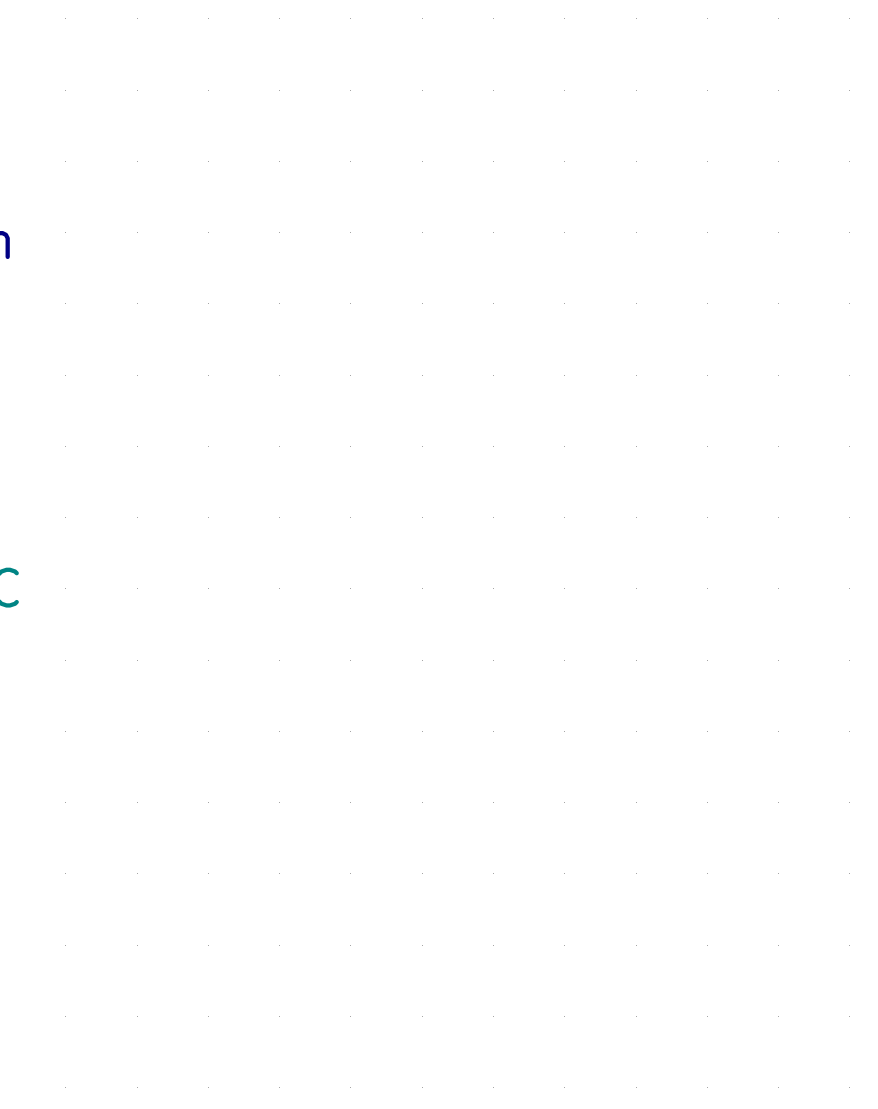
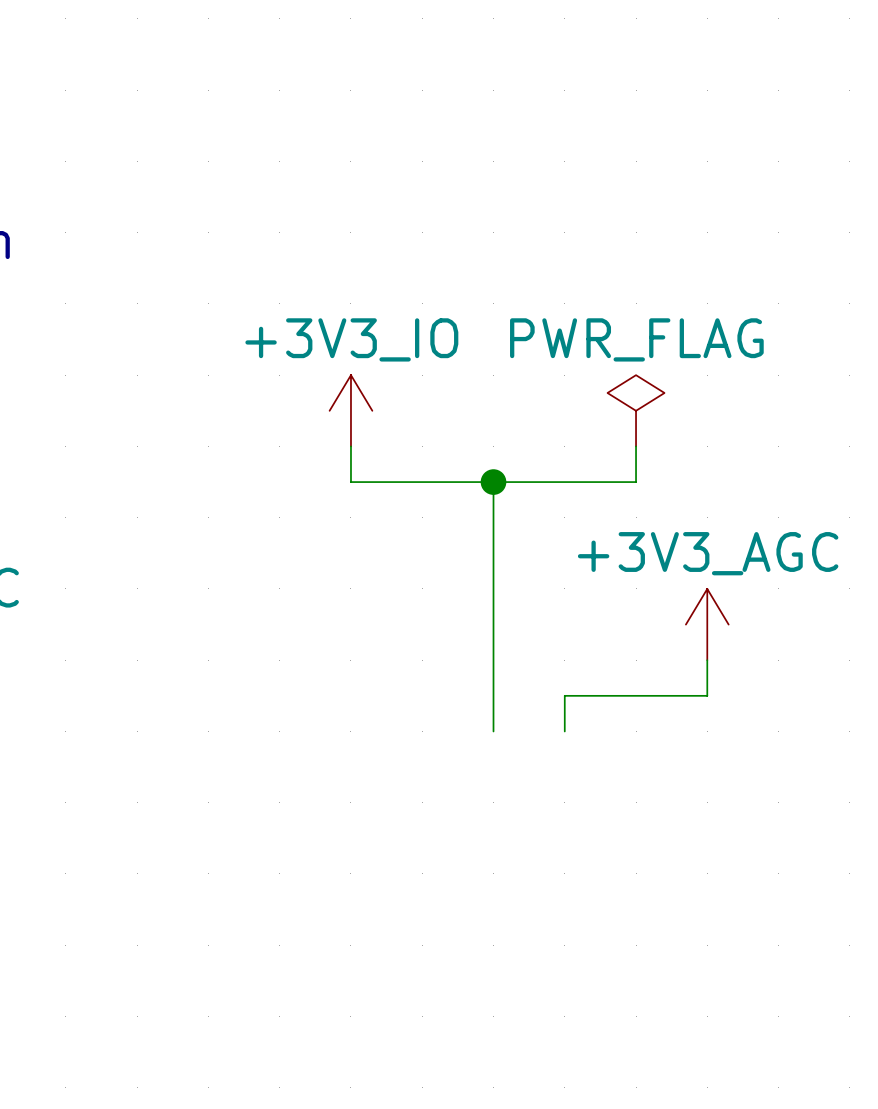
power symbol: none -> +3V3_IO (350, 410)
power symbol: none -> PWR_FLAG (636, 410)
wire: none -> (350, 446) (350, 482) (636, 482) (636, 446)
wire: none -> (493, 482) (493, 731)
junction: none -> (493, 482)
power symbol: none -> +3V3_AGC (707, 624)
wire: none -> (707, 660) (707, 695) (564, 695) (564, 731)

